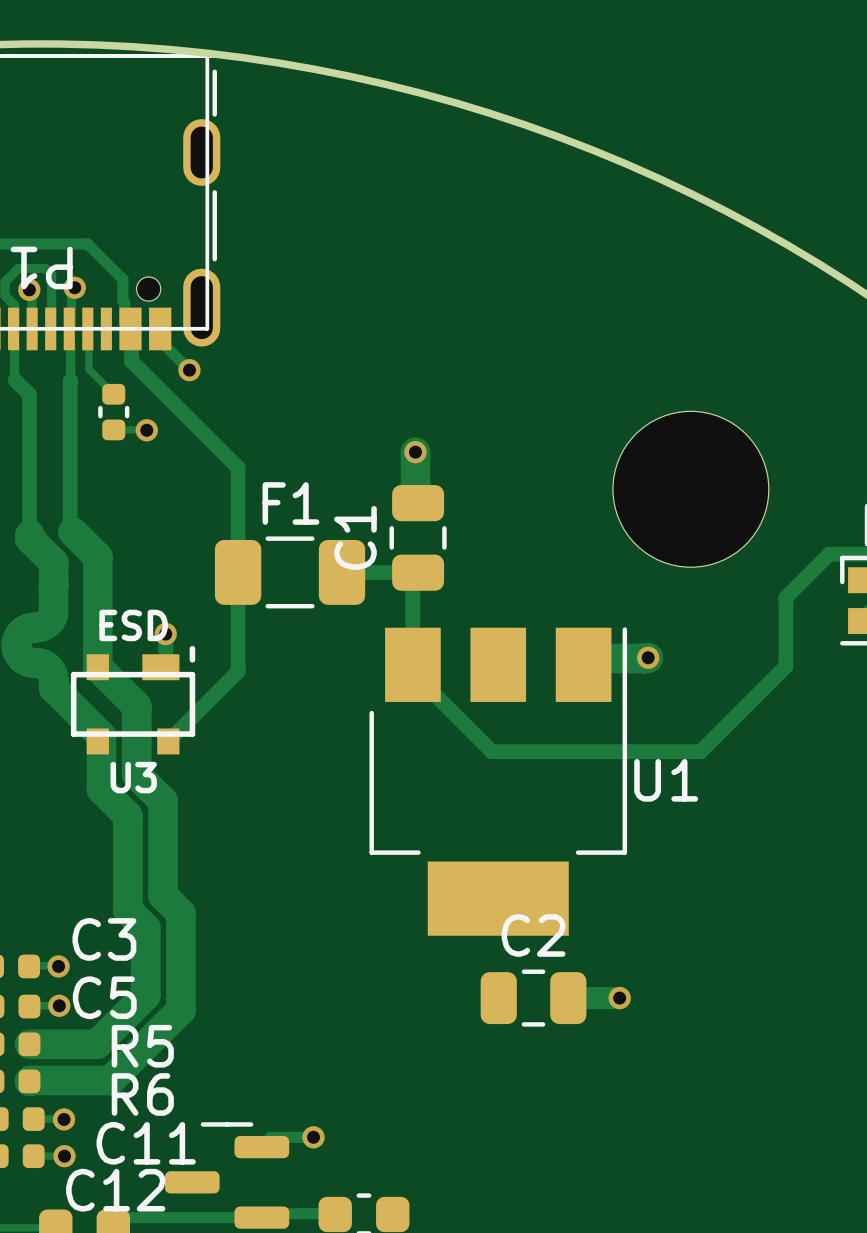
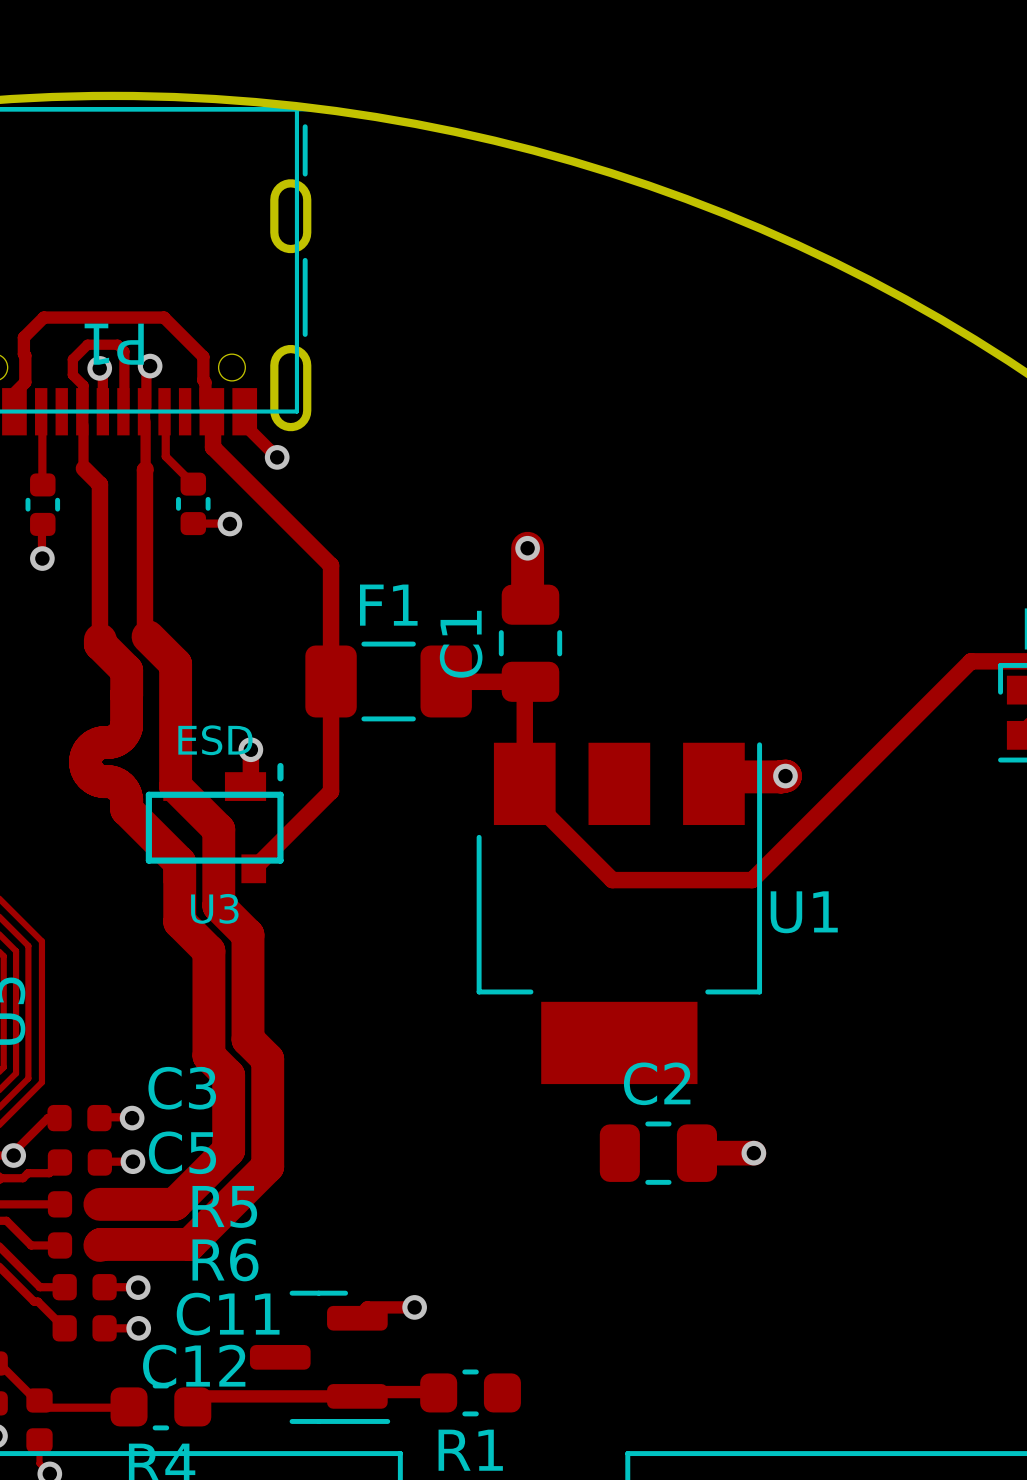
part: (690, 489) -> none
track: (829, 554) (785, 597) (785, 666) (700, 751) (618, 751) -> (986, 661) (970, 661) (752, 880)

